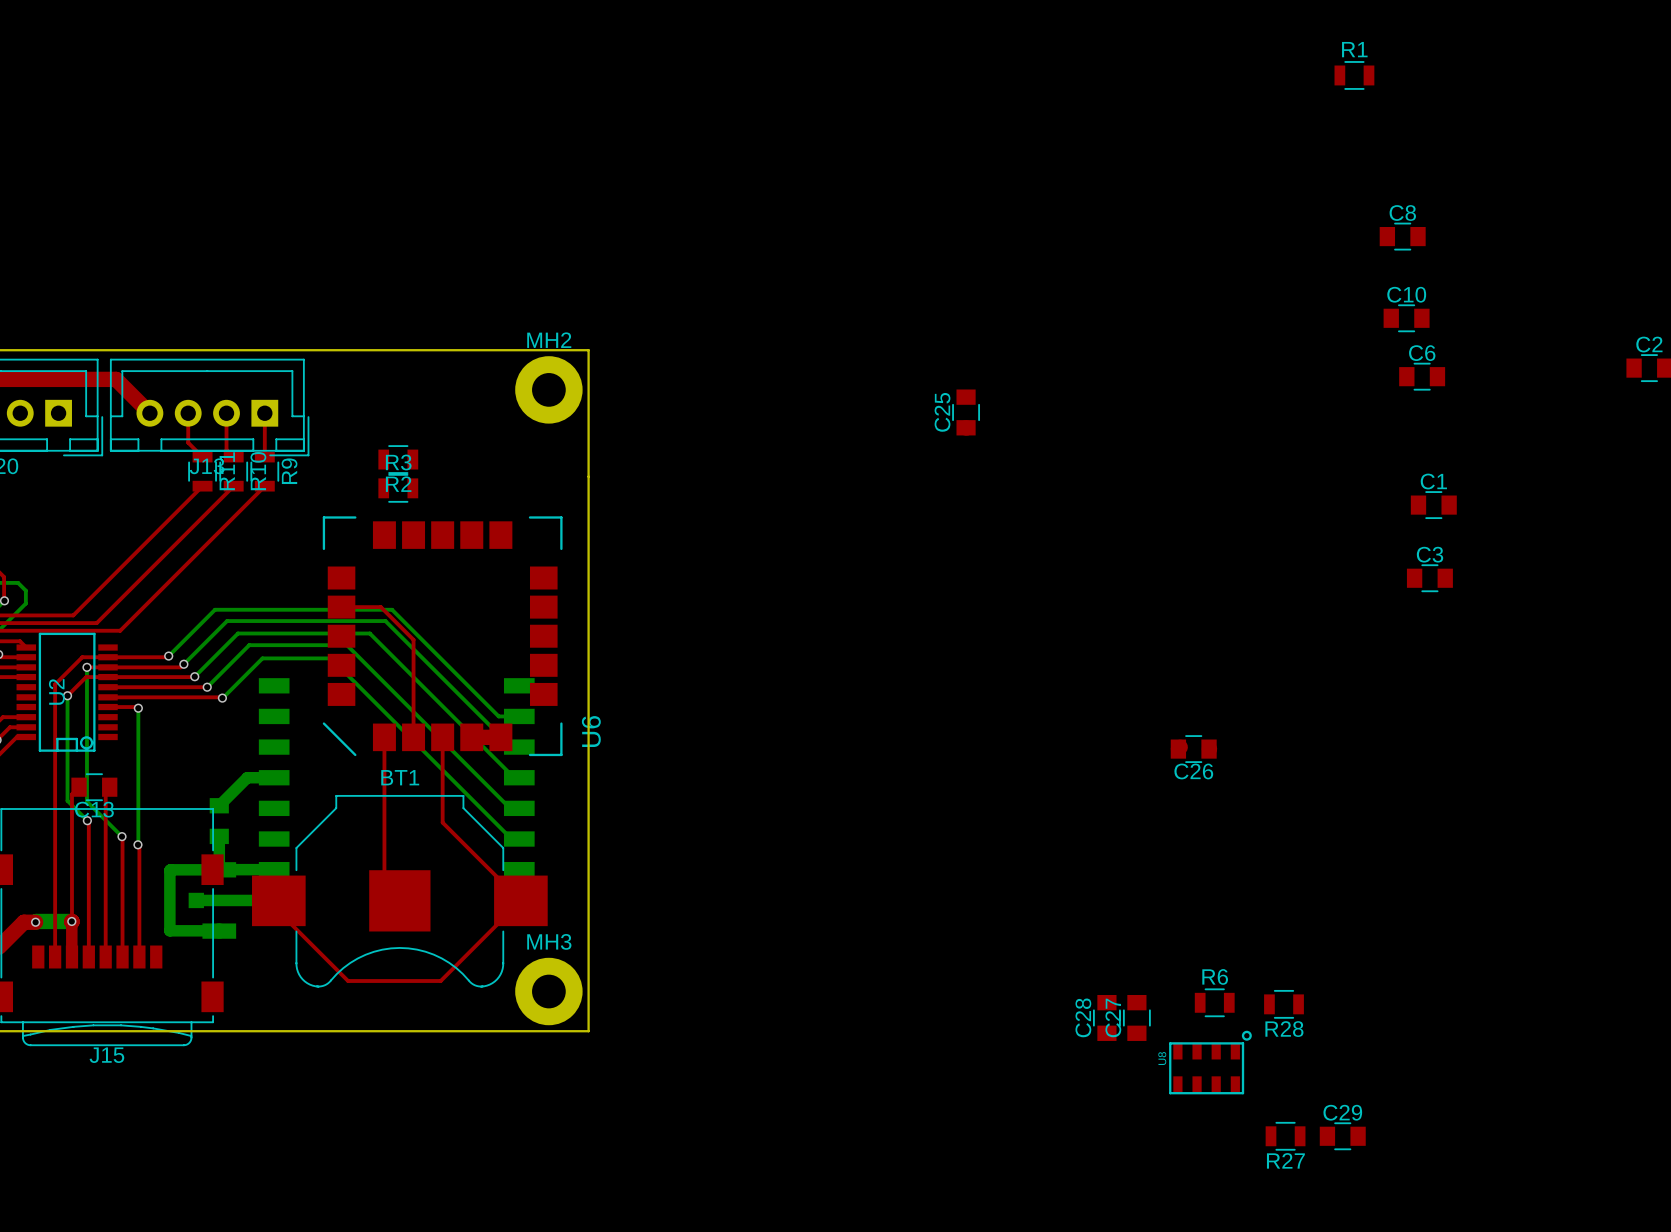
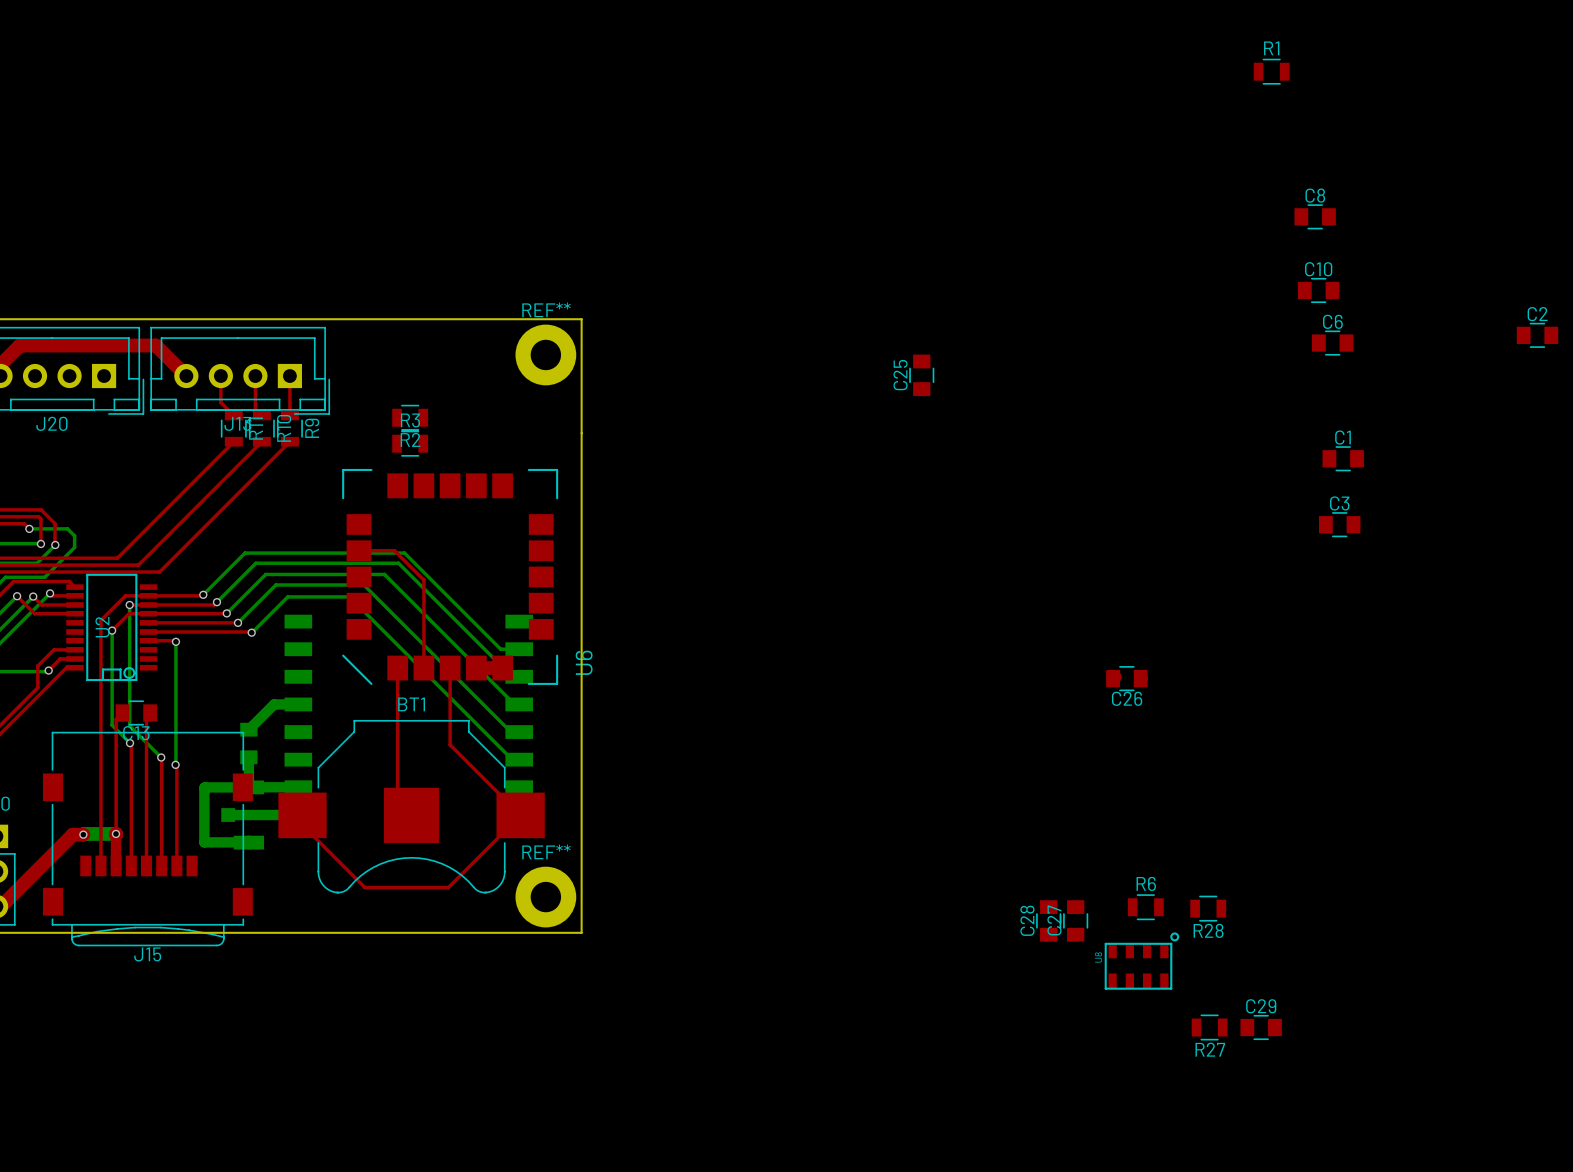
MH2 name: MH2 (549, 340) -> REF** (546, 309)
MH3 name: MH3 (549, 941) -> REF** (546, 851)

